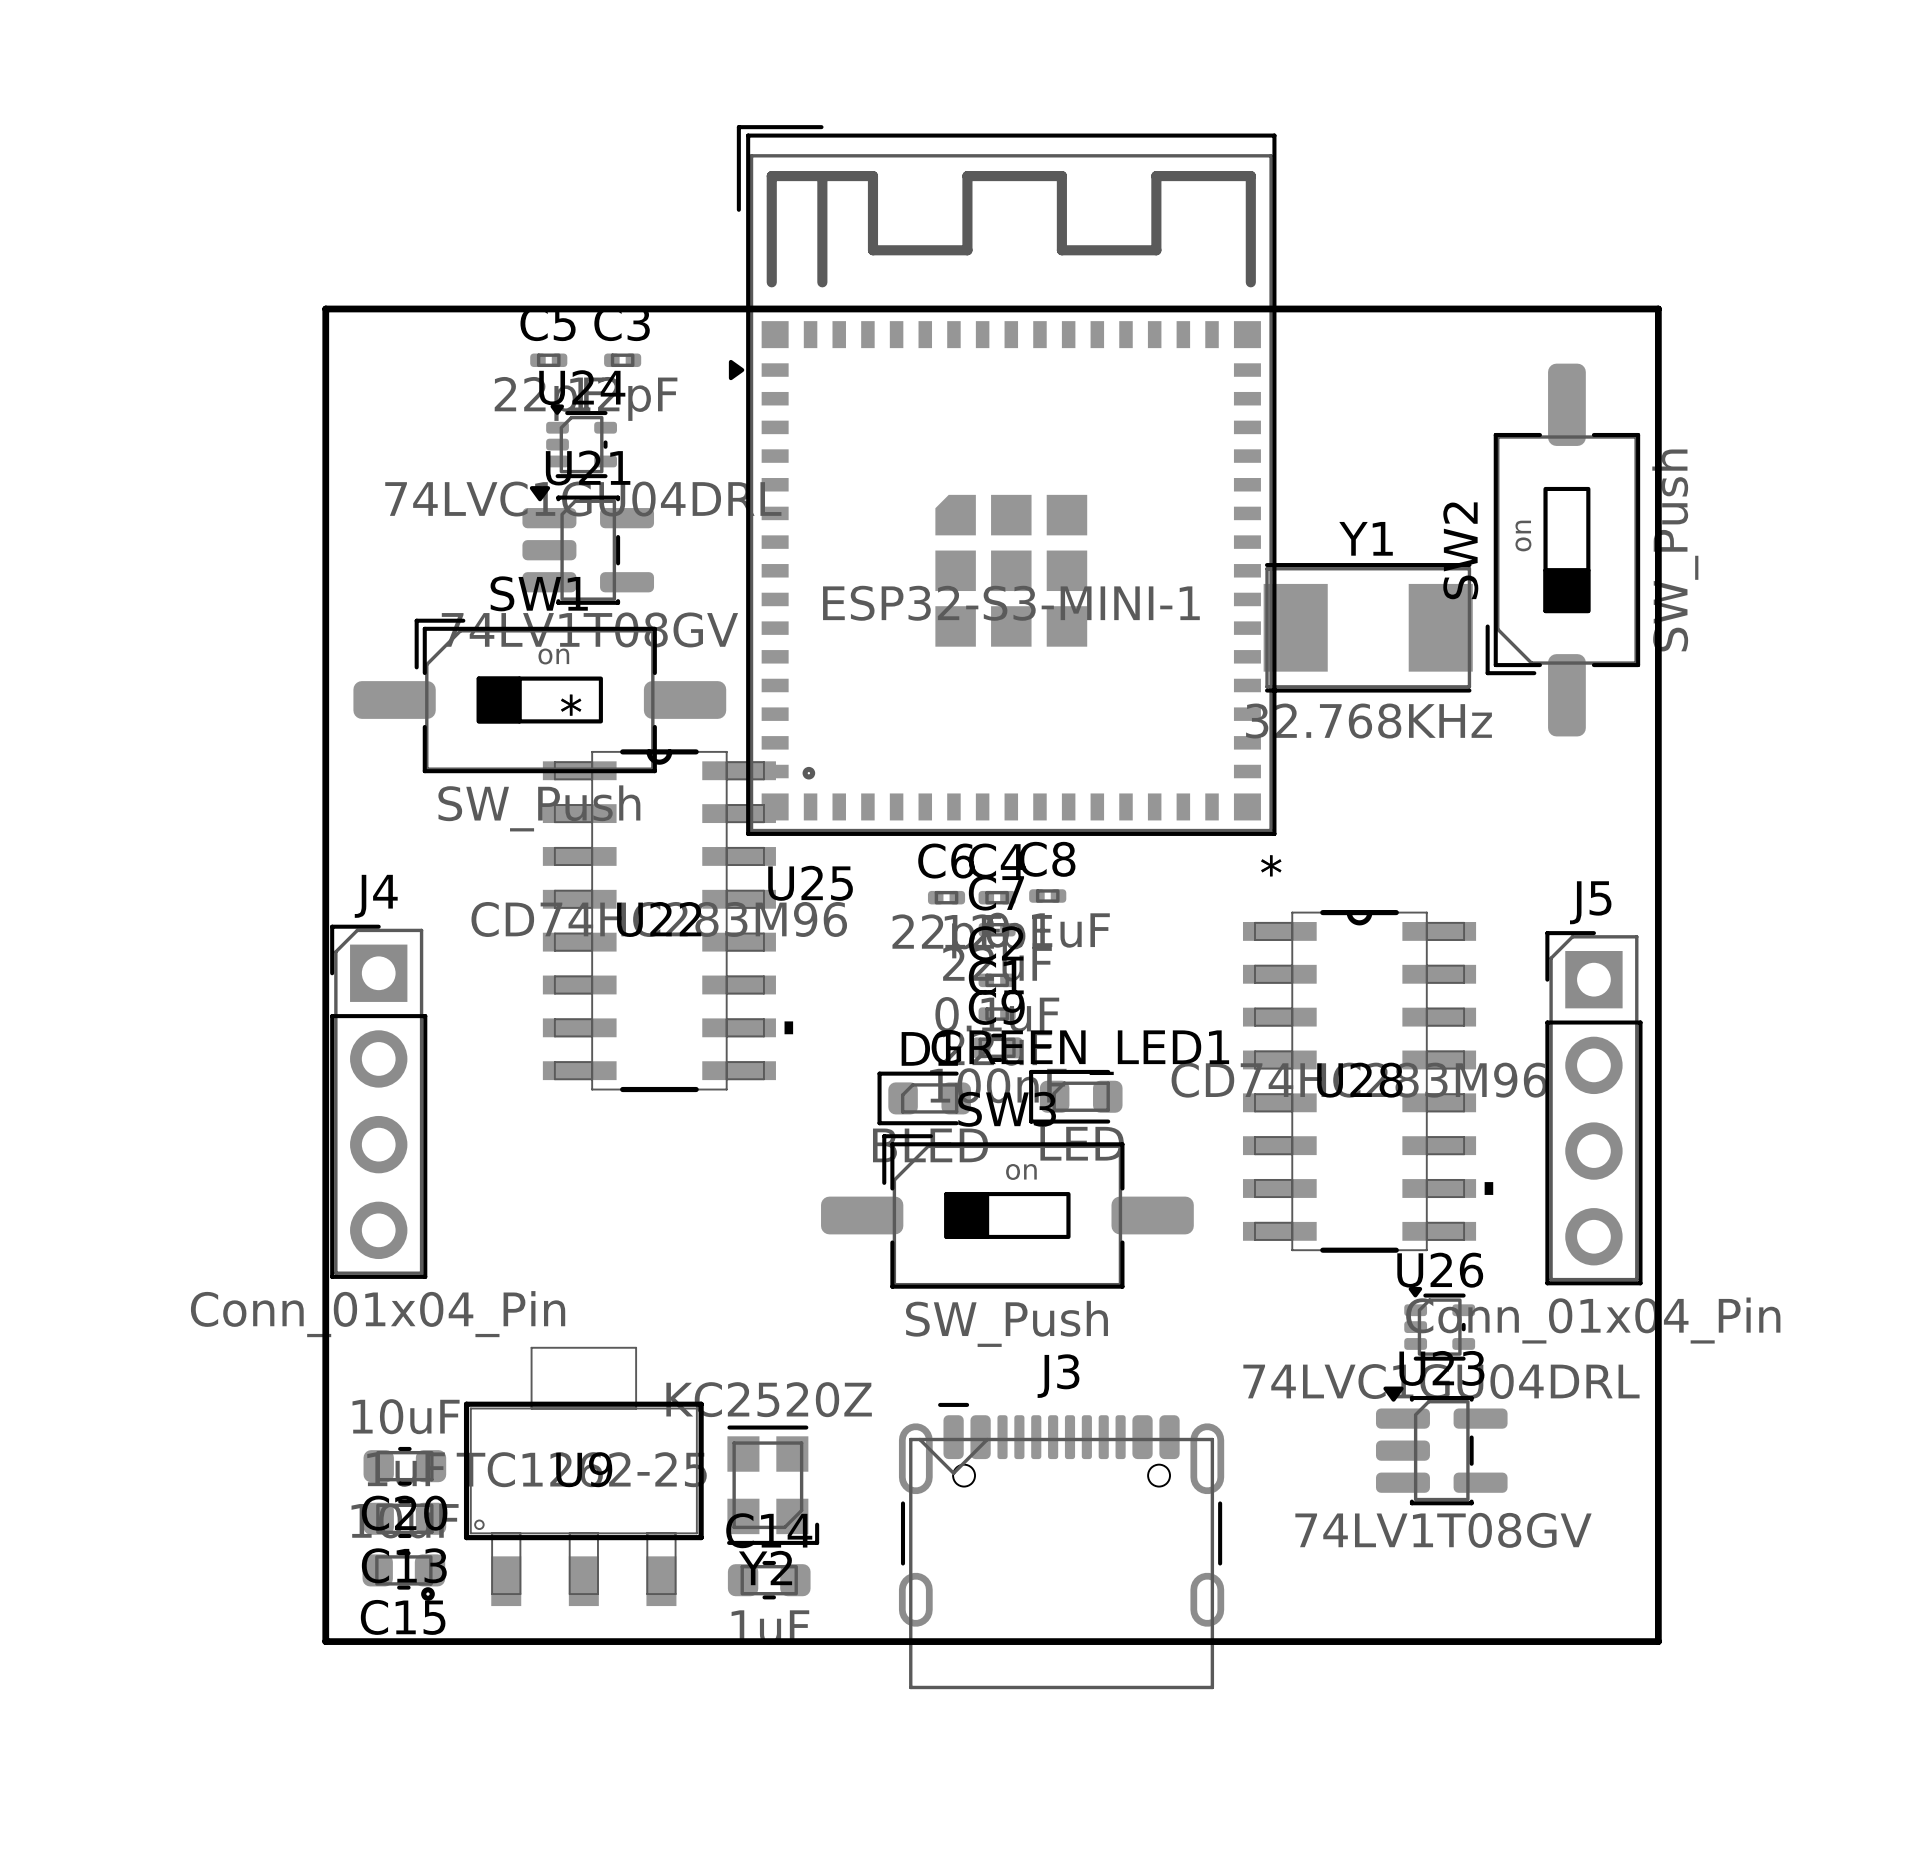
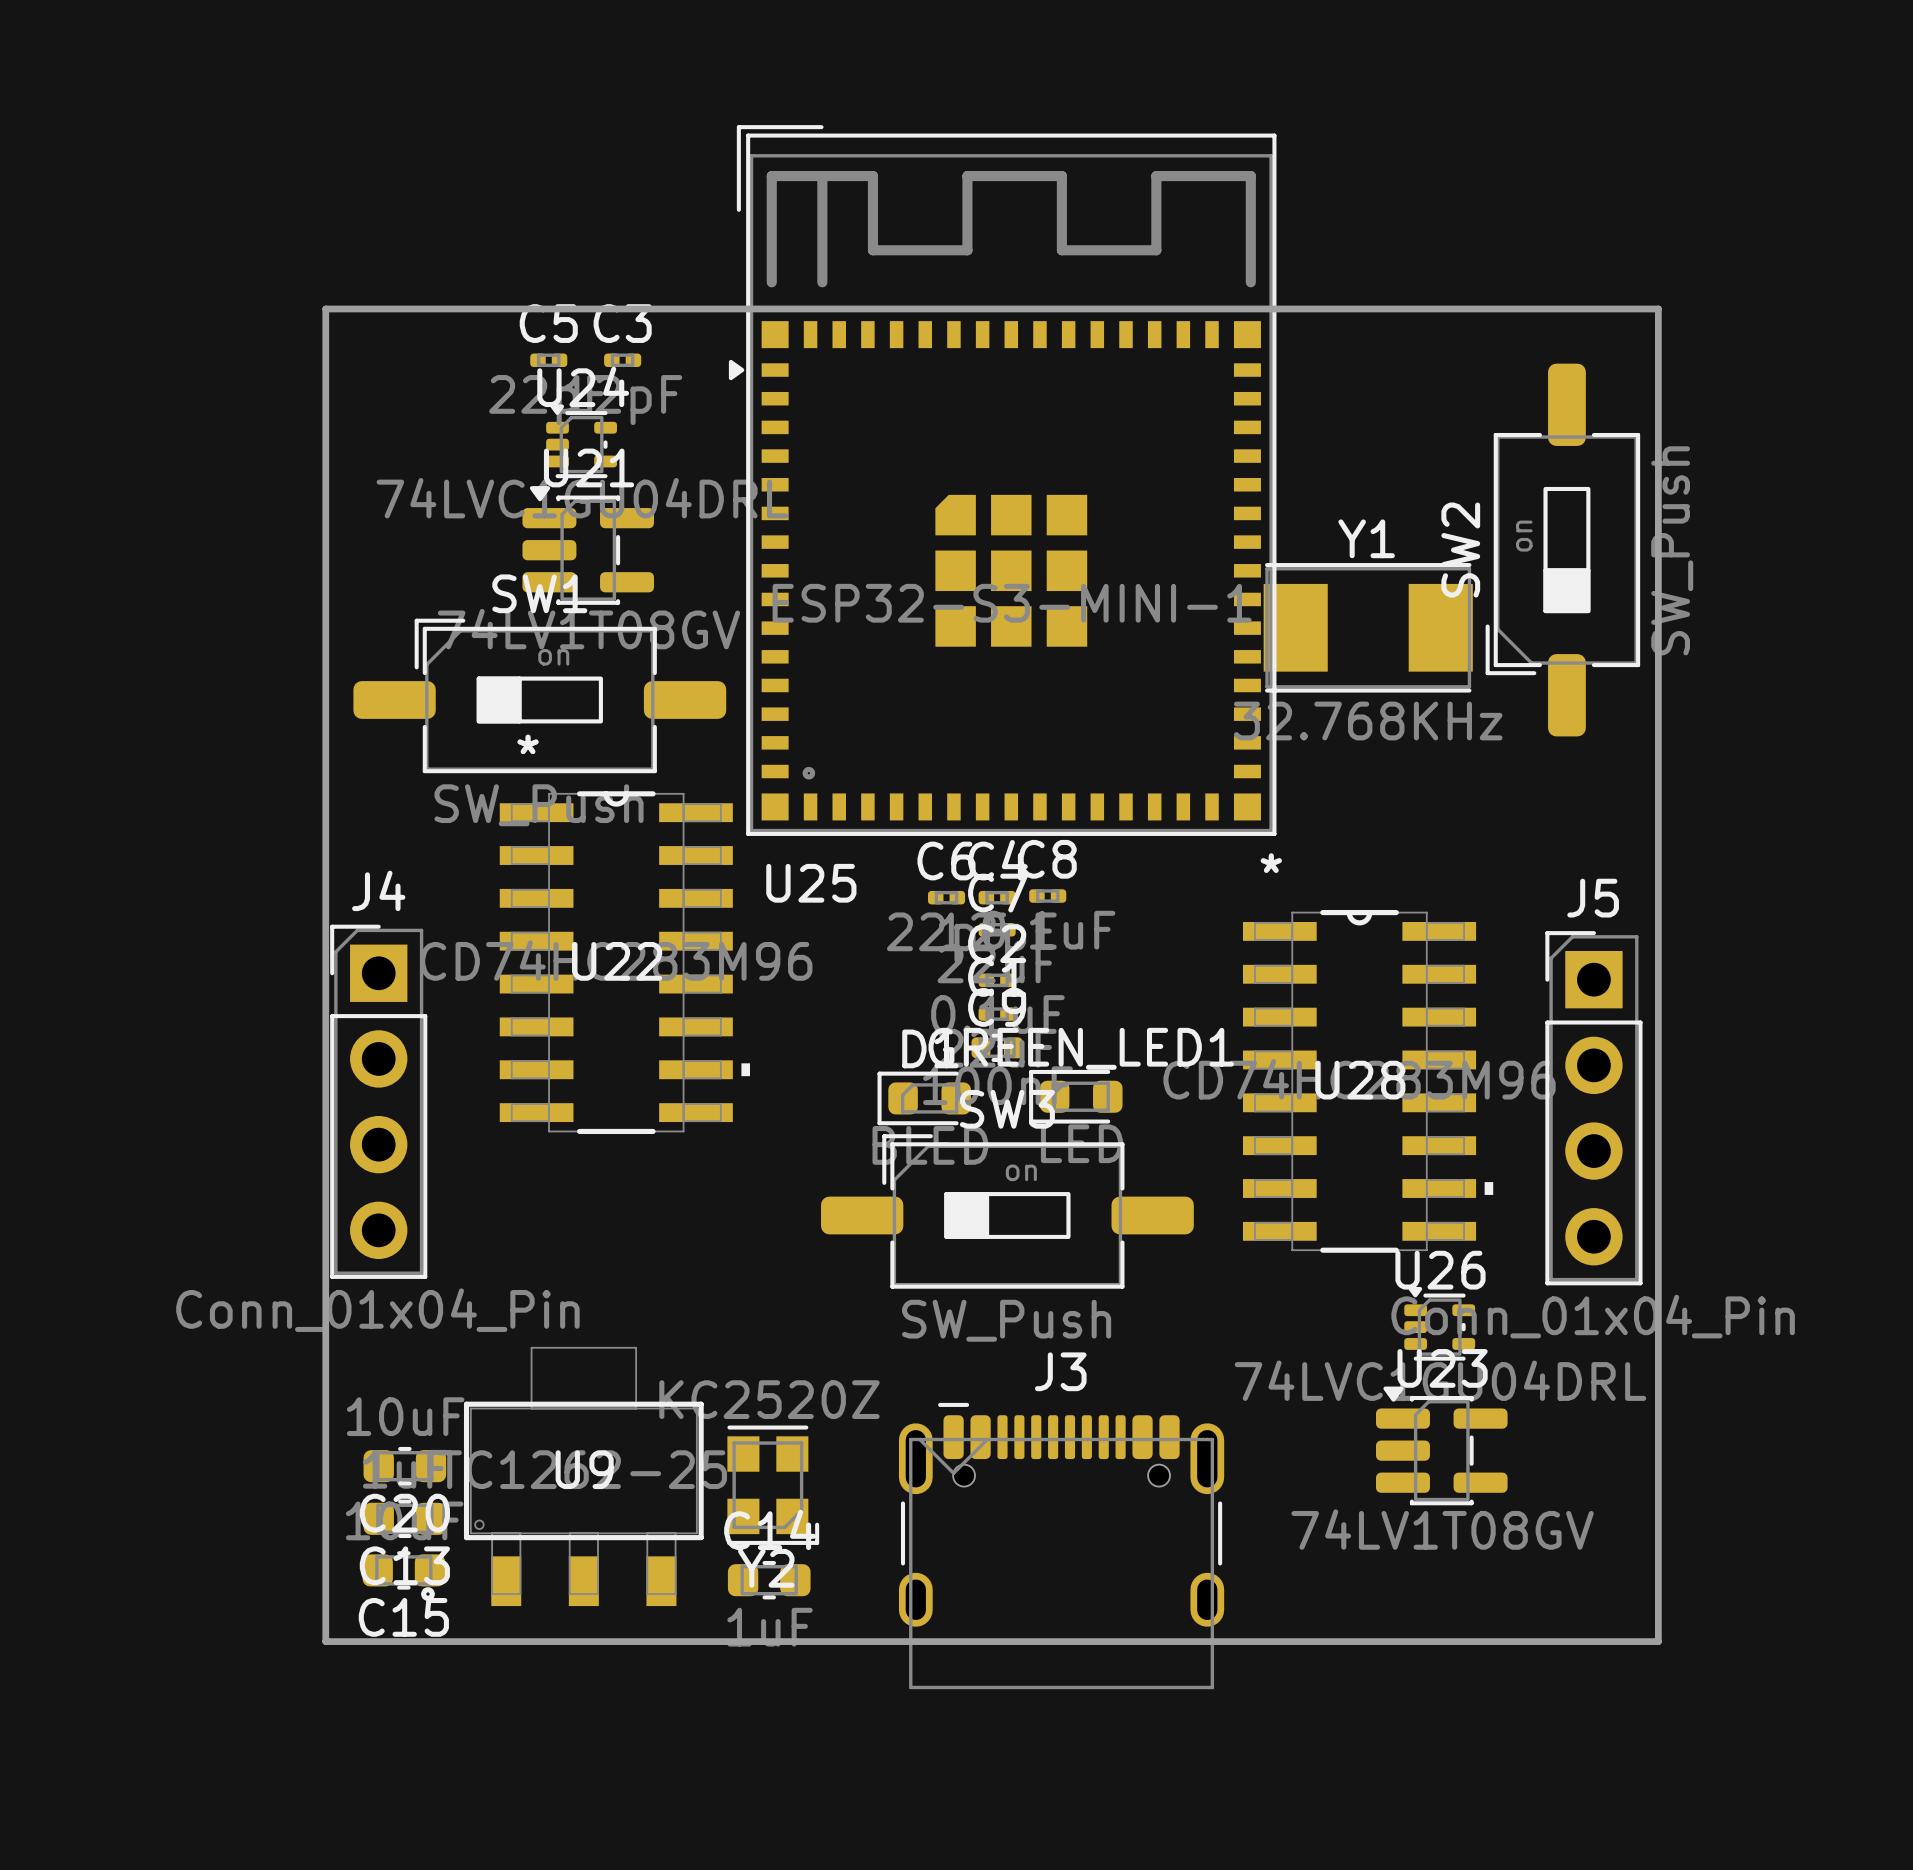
U22 position: (667, 920) -> (624, 962)

